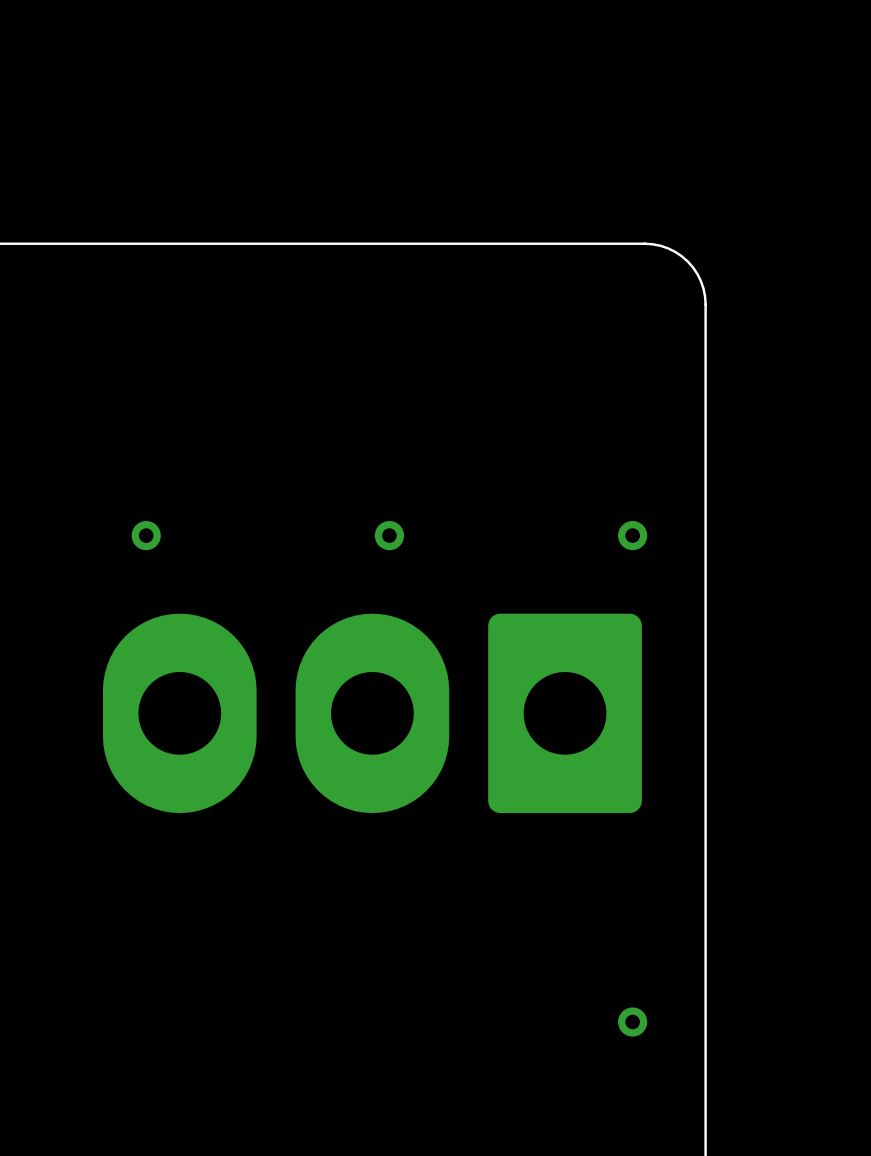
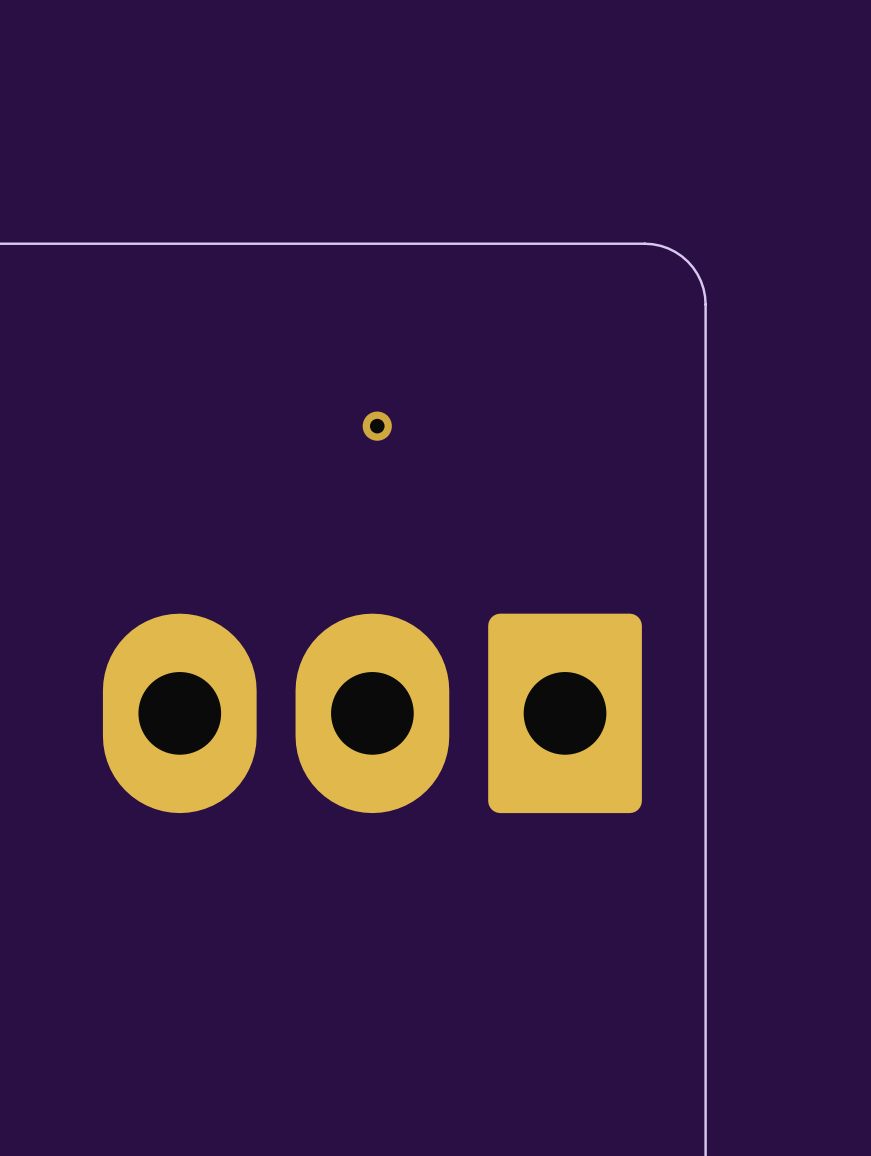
via: (146, 535) -> none
via position: (389, 535) -> (377, 426)
via: (632, 535) -> none
via: (632, 1022) -> none

